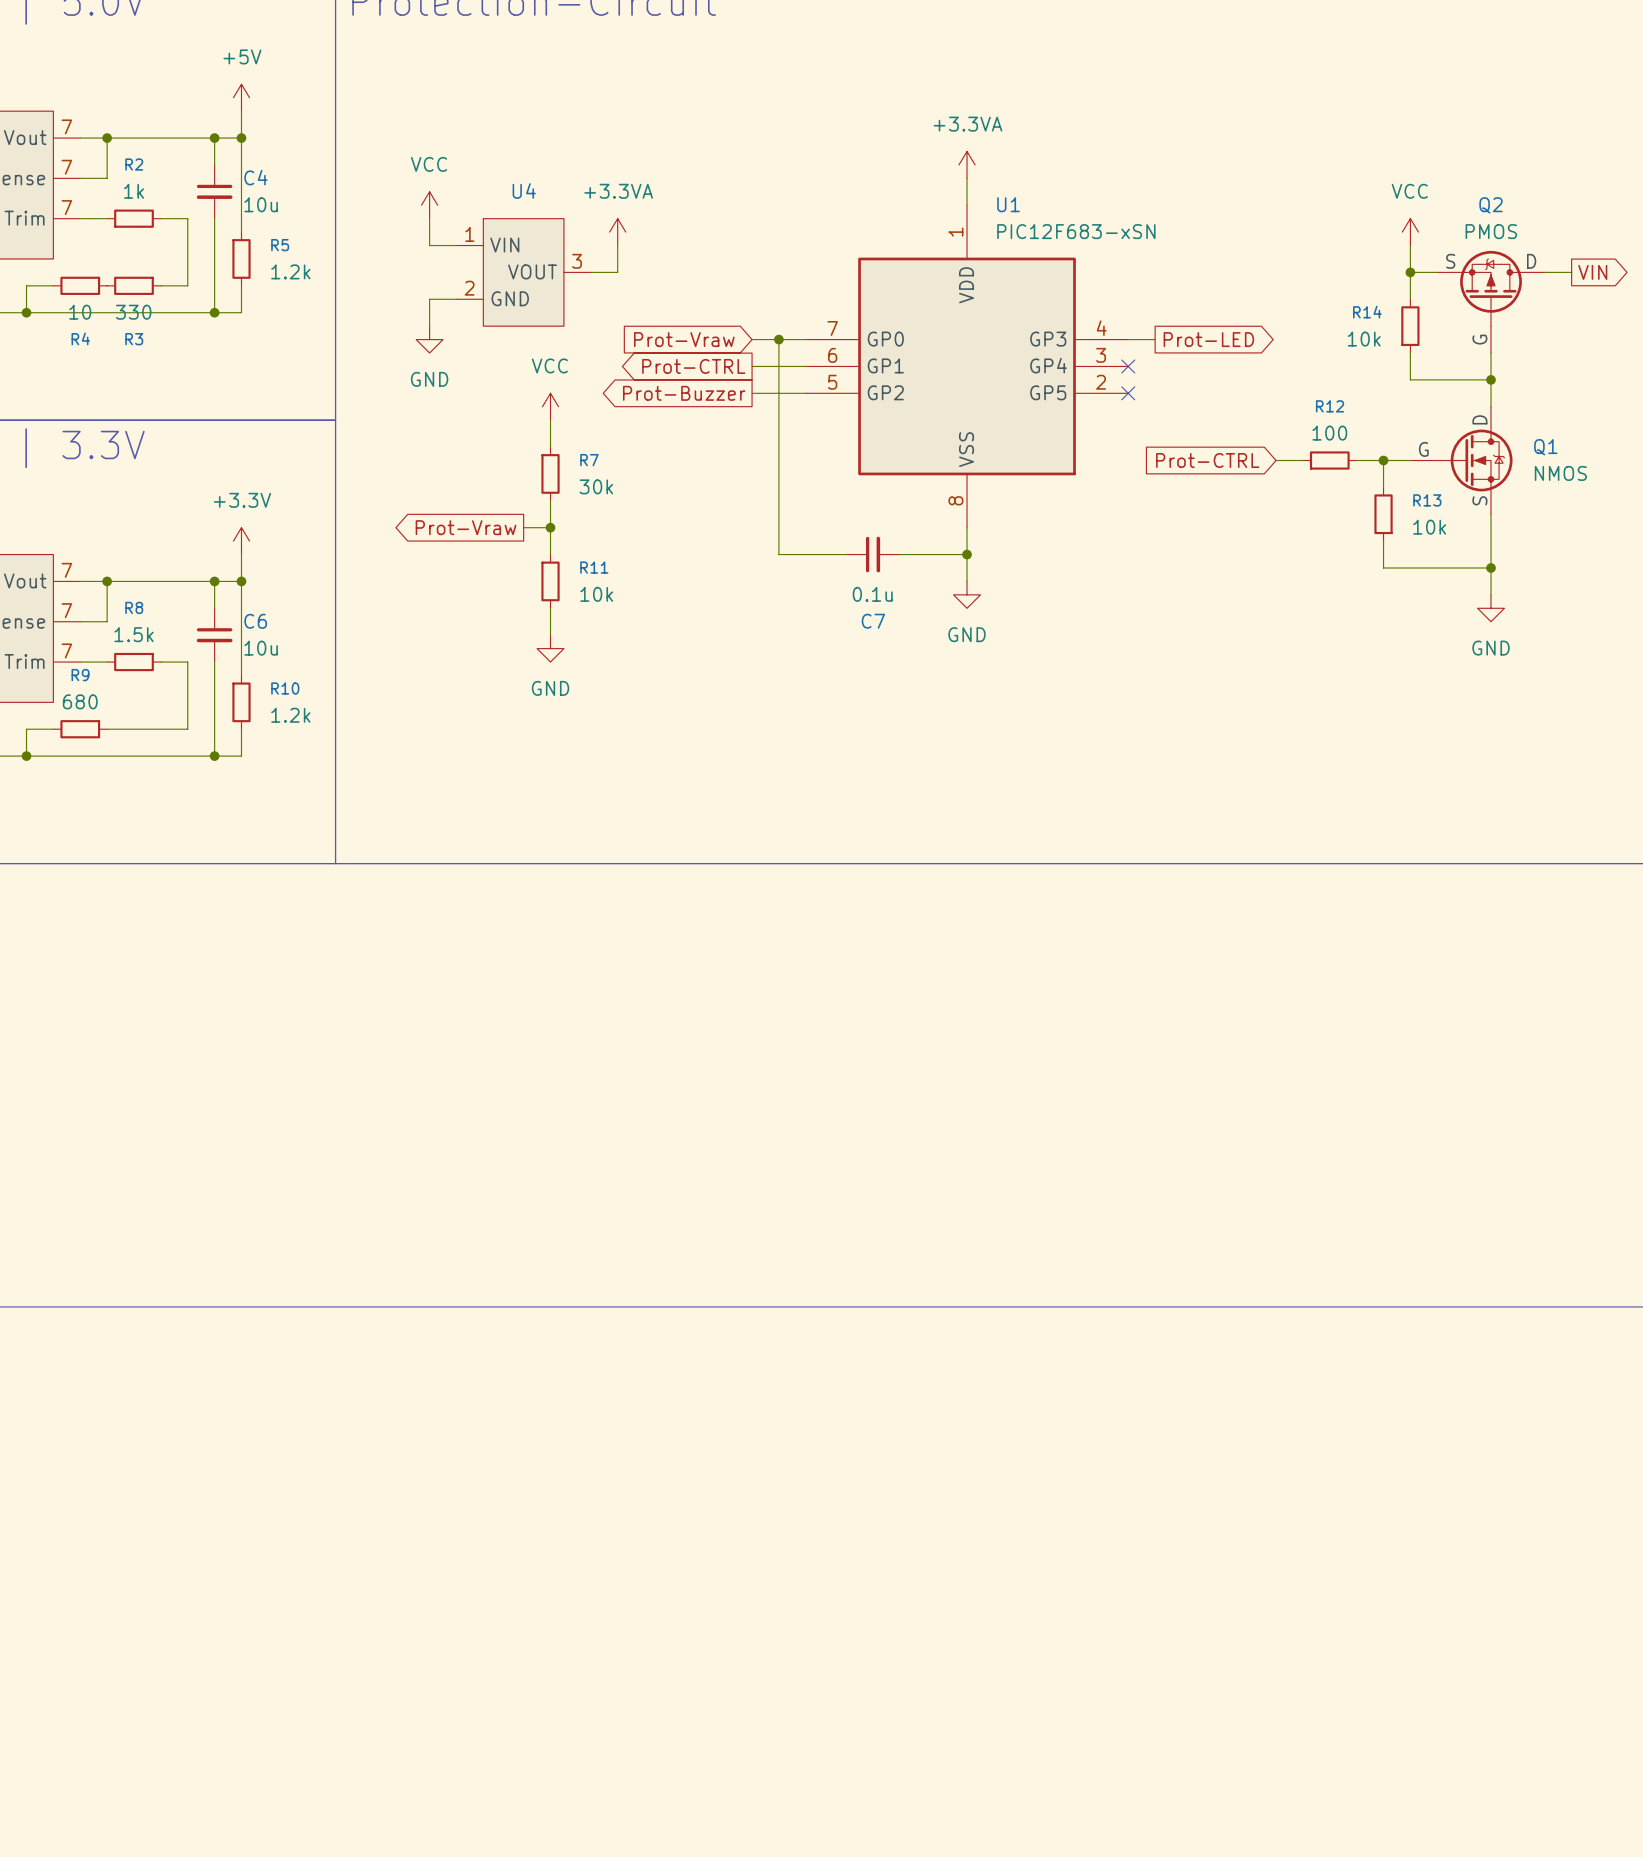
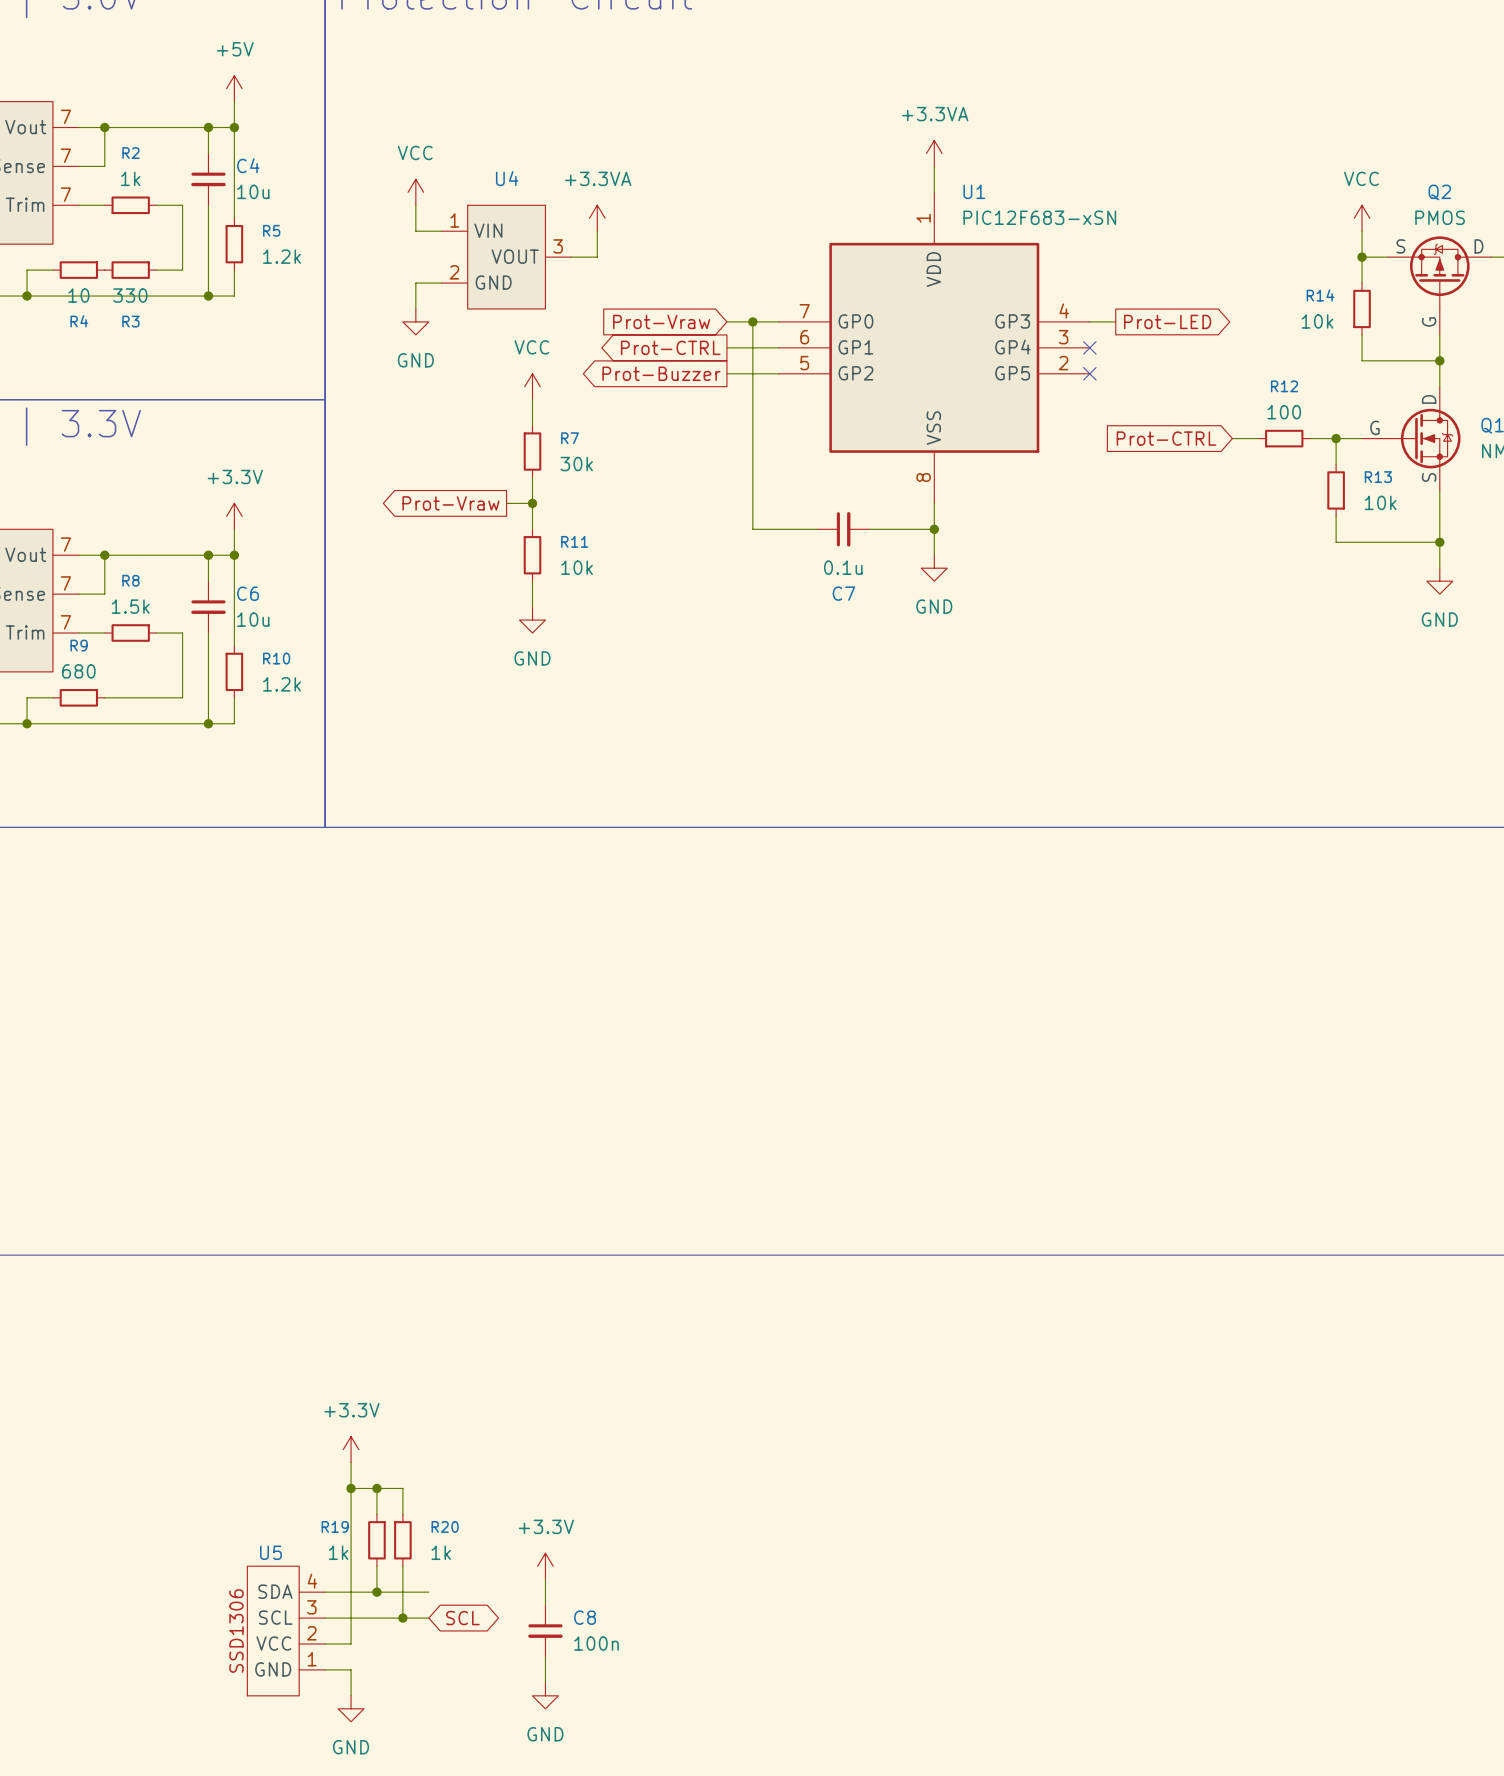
power symbol: none -> +3.3V (351, 1449)
wire: none -> (351, 1462) (351, 1643) (325, 1643)
wire: none -> (351, 1488) (402, 1488) (402, 1514)
junction: none -> (351, 1488)
wire: none -> (376, 1488) (376, 1514)
junction: none -> (376, 1488)
R19: none -> 1k (376, 1540)
R20: none -> 1k (402, 1540)
wire: none -> (376, 1566) (376, 1592)
wire: none -> (402, 1566) (402, 1618)
power symbol: none -> +3.3V (545, 1566)
wire: none -> (545, 1579) (545, 1605)
wire: none -> (325, 1592) (428, 1592)
junction: none -> (376, 1592)
wire: none -> (325, 1618) (428, 1618)
junction: none -> (402, 1618)
global label: none -> SCL (462, 1618)
U5: none -> (286, 1631)
C8: none -> 100n (545, 1631)
wire: none -> (545, 1656) (545, 1682)
wire: none -> (325, 1669) (351, 1669) (351, 1695)
power symbol: none -> GND (545, 1695)
power symbol: none -> GND (351, 1708)

